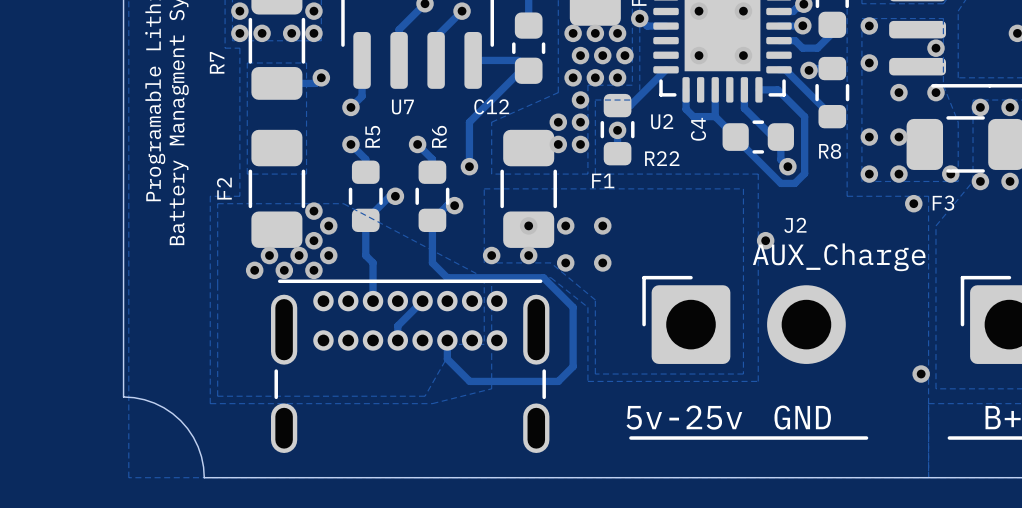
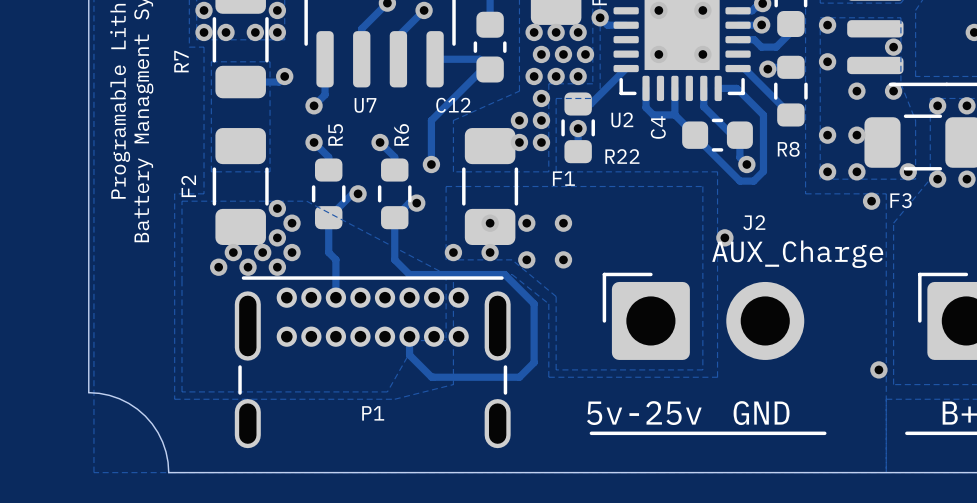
track: (422, 301) (397, 325) (397, 340) -> none
P1 name: none -> P1 (373, 413)

